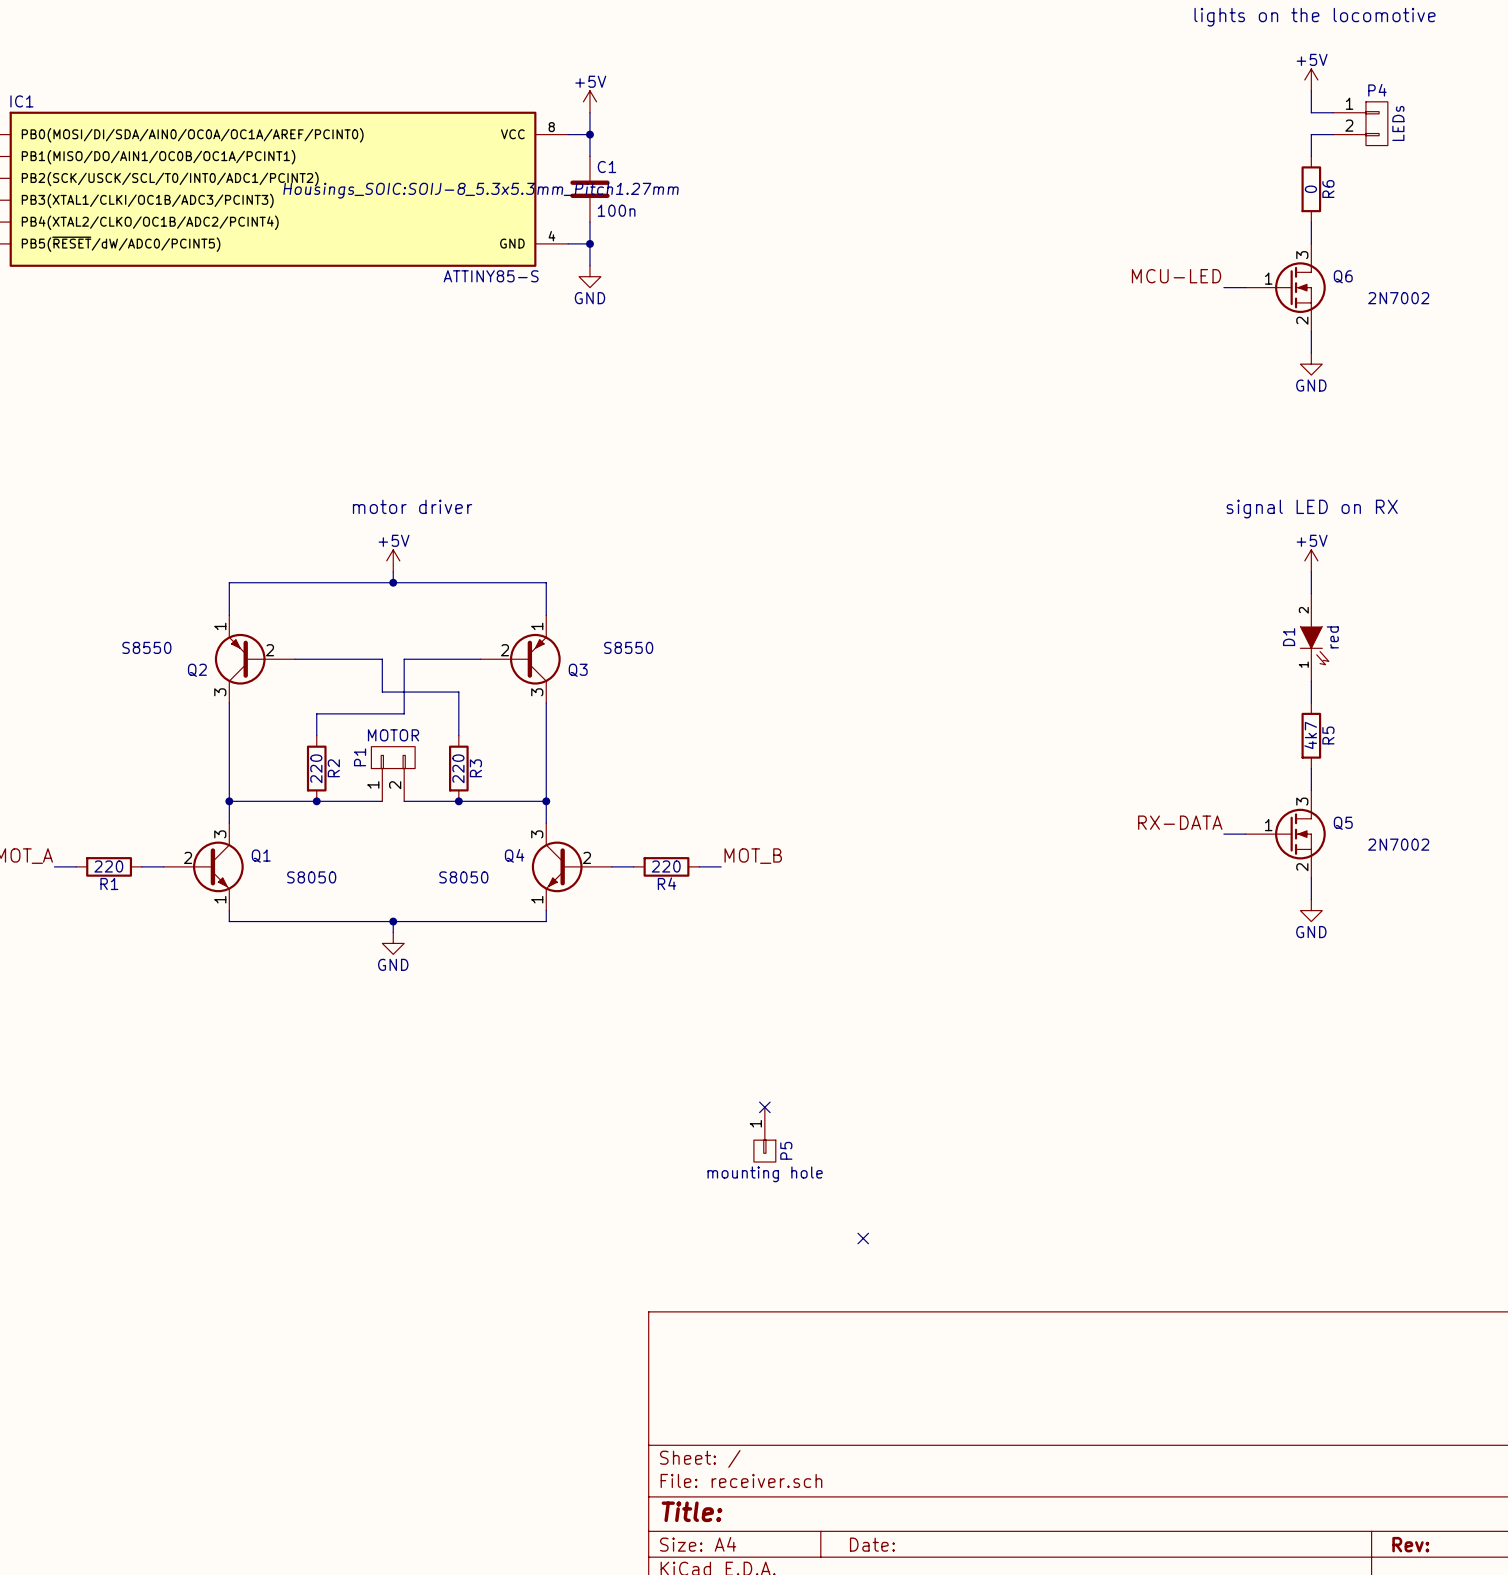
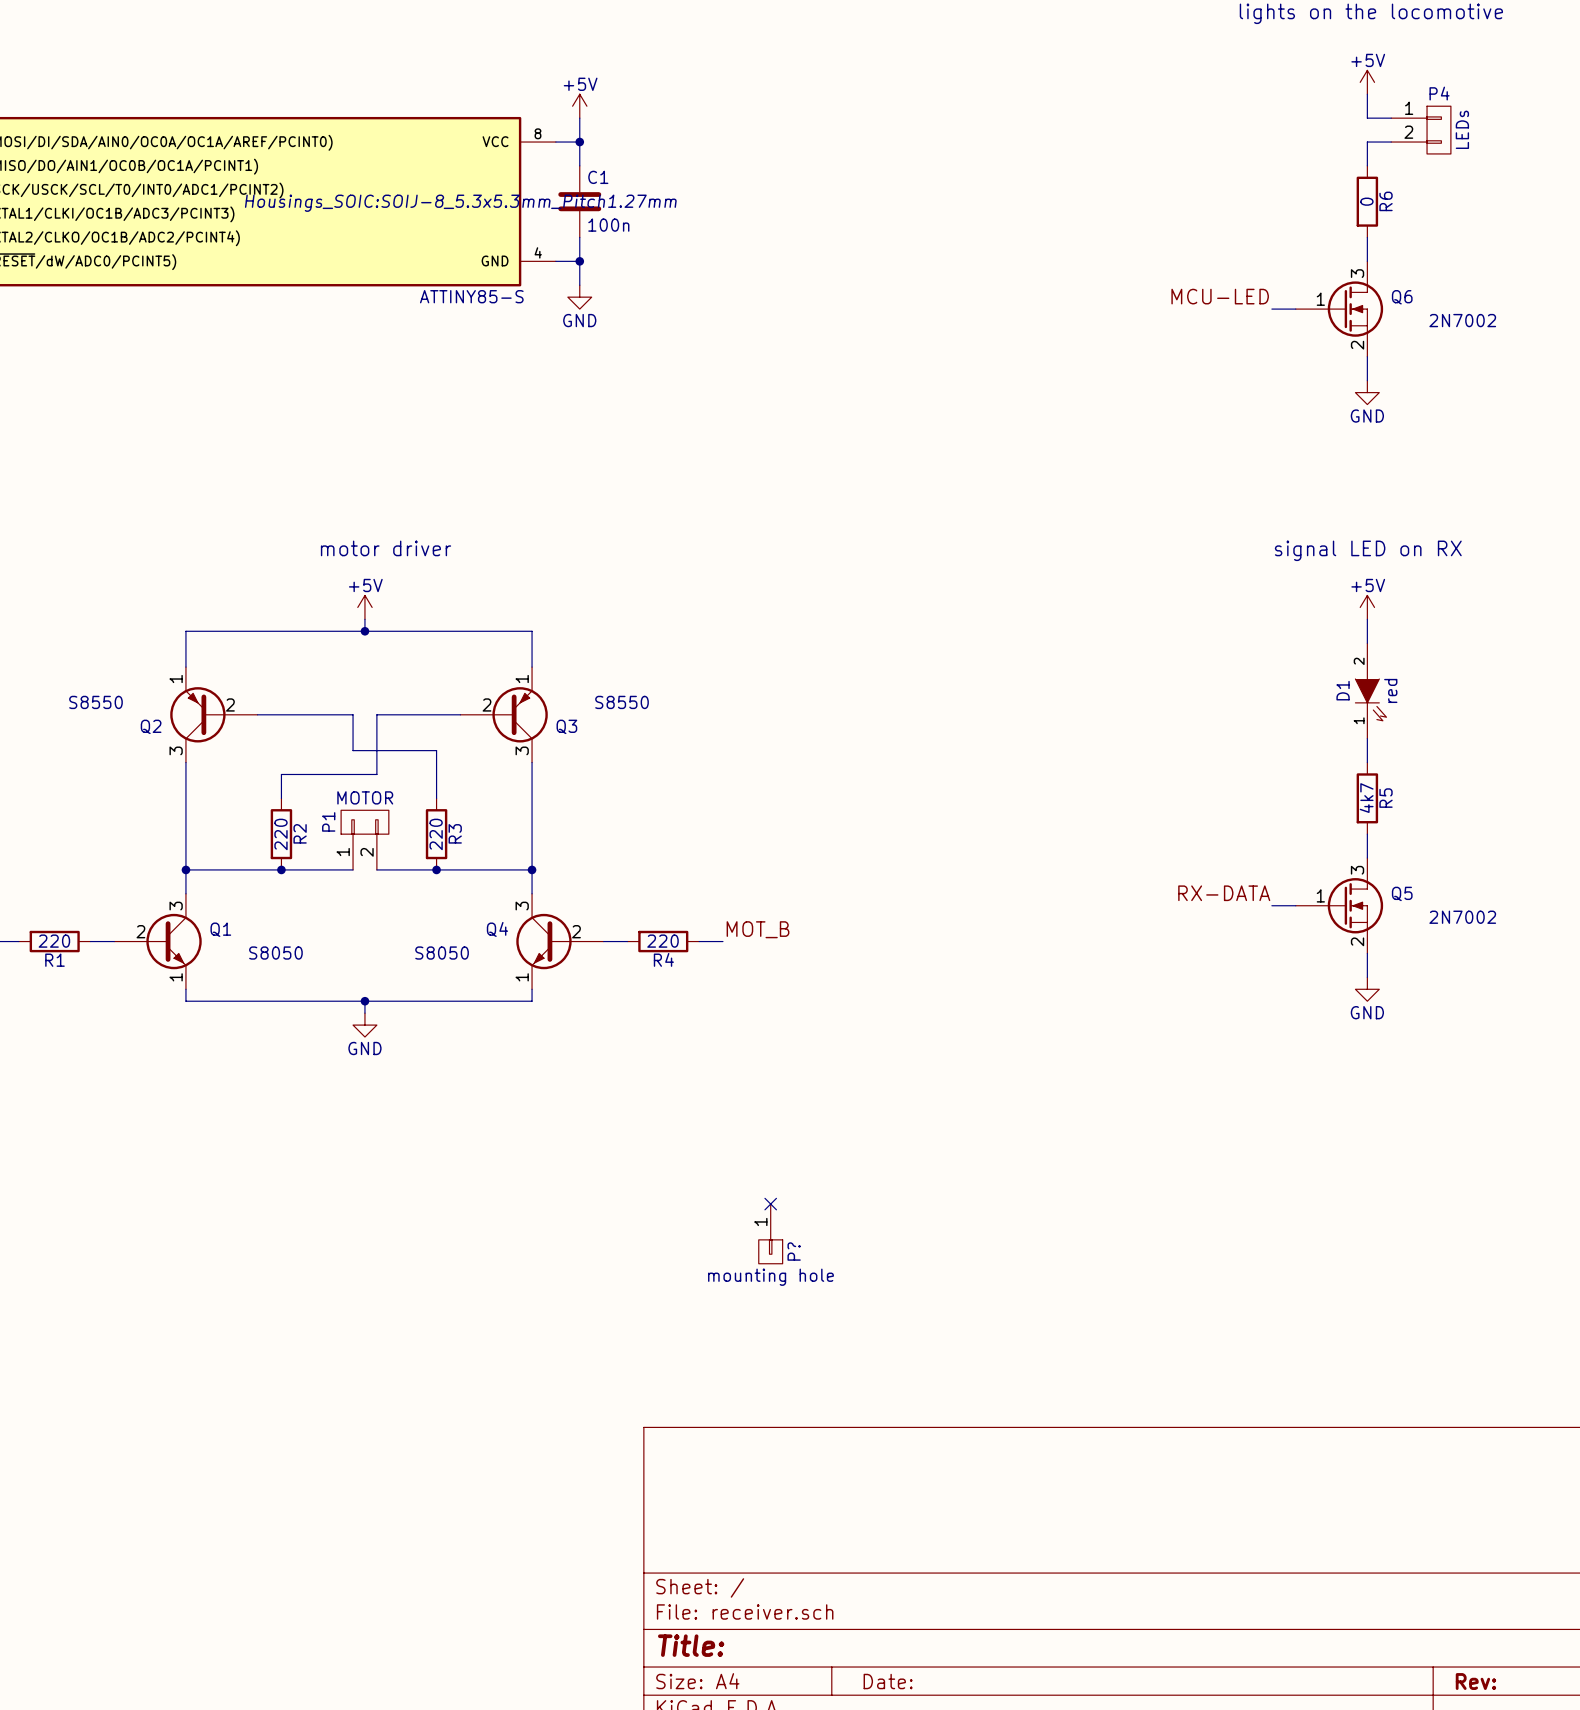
P5 name: P5 (786, 1150) -> P? (794, 1251)
no-connect mark: (863, 1238) -> none

